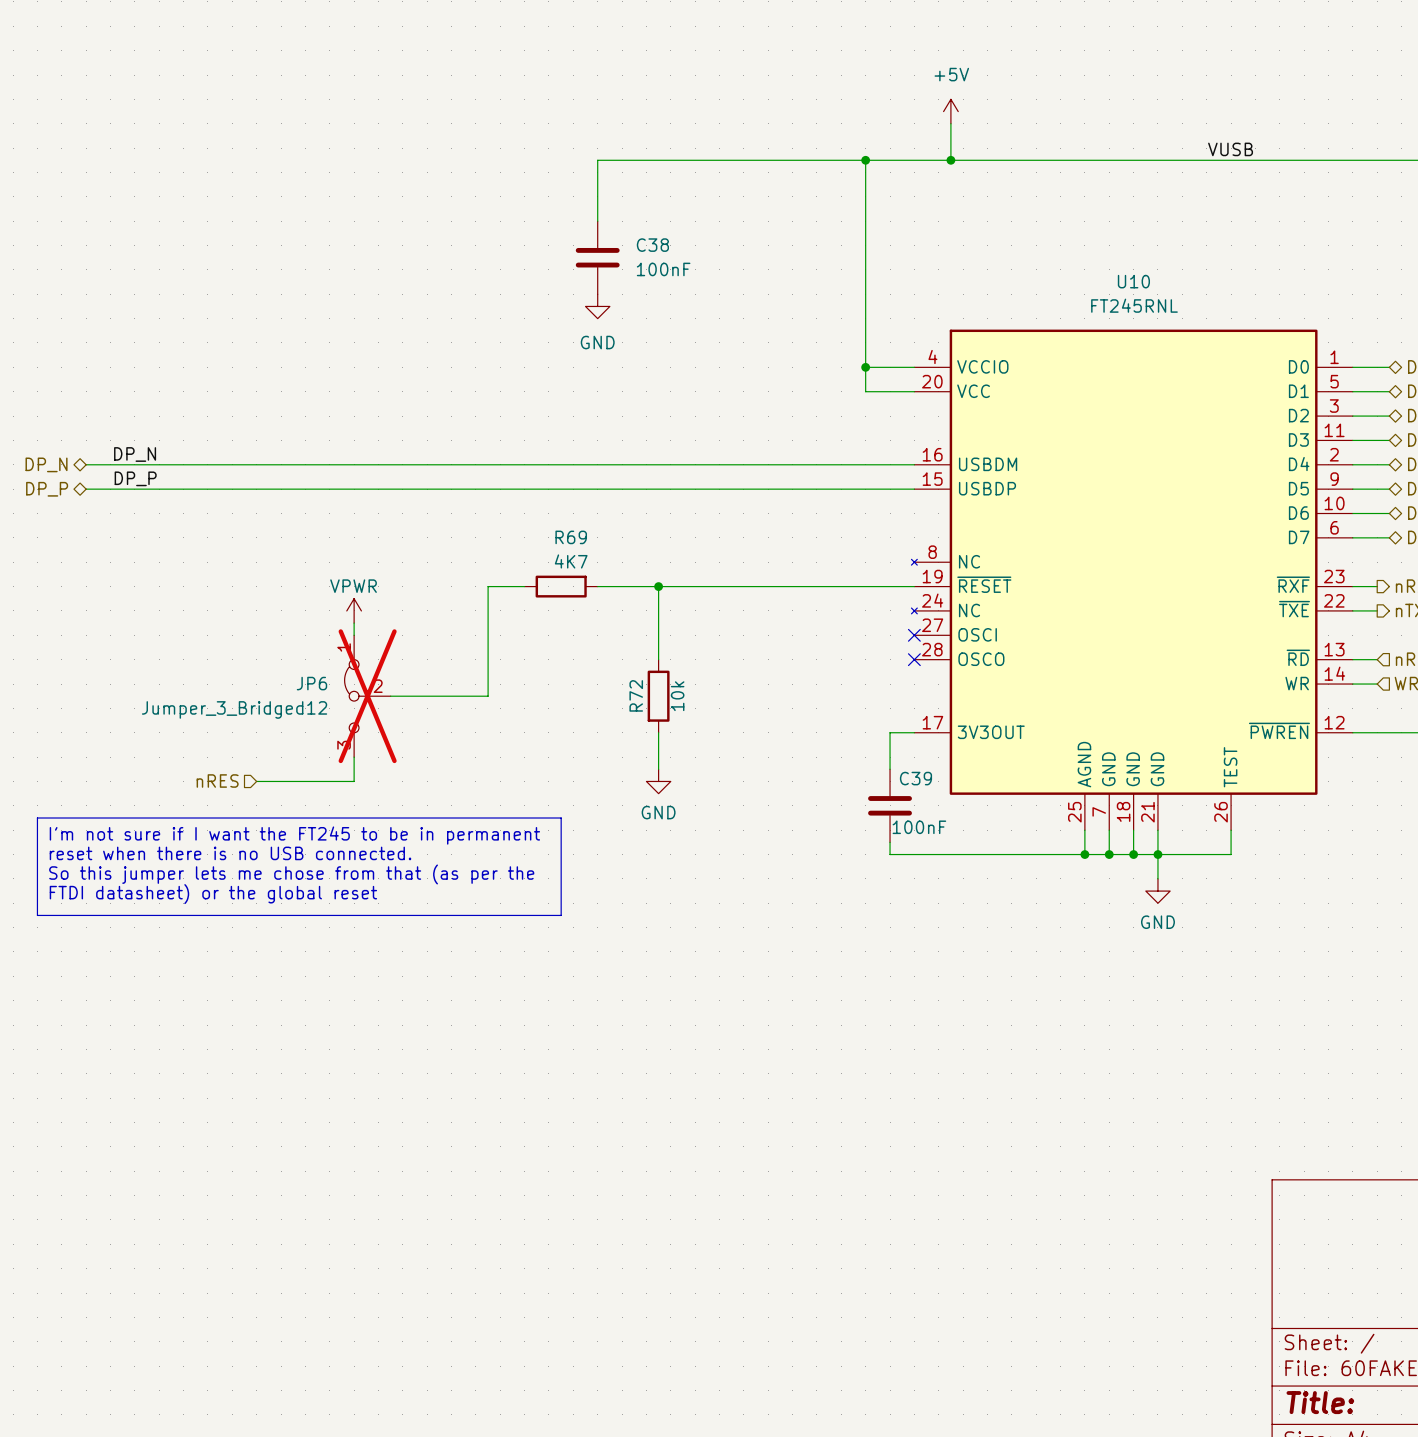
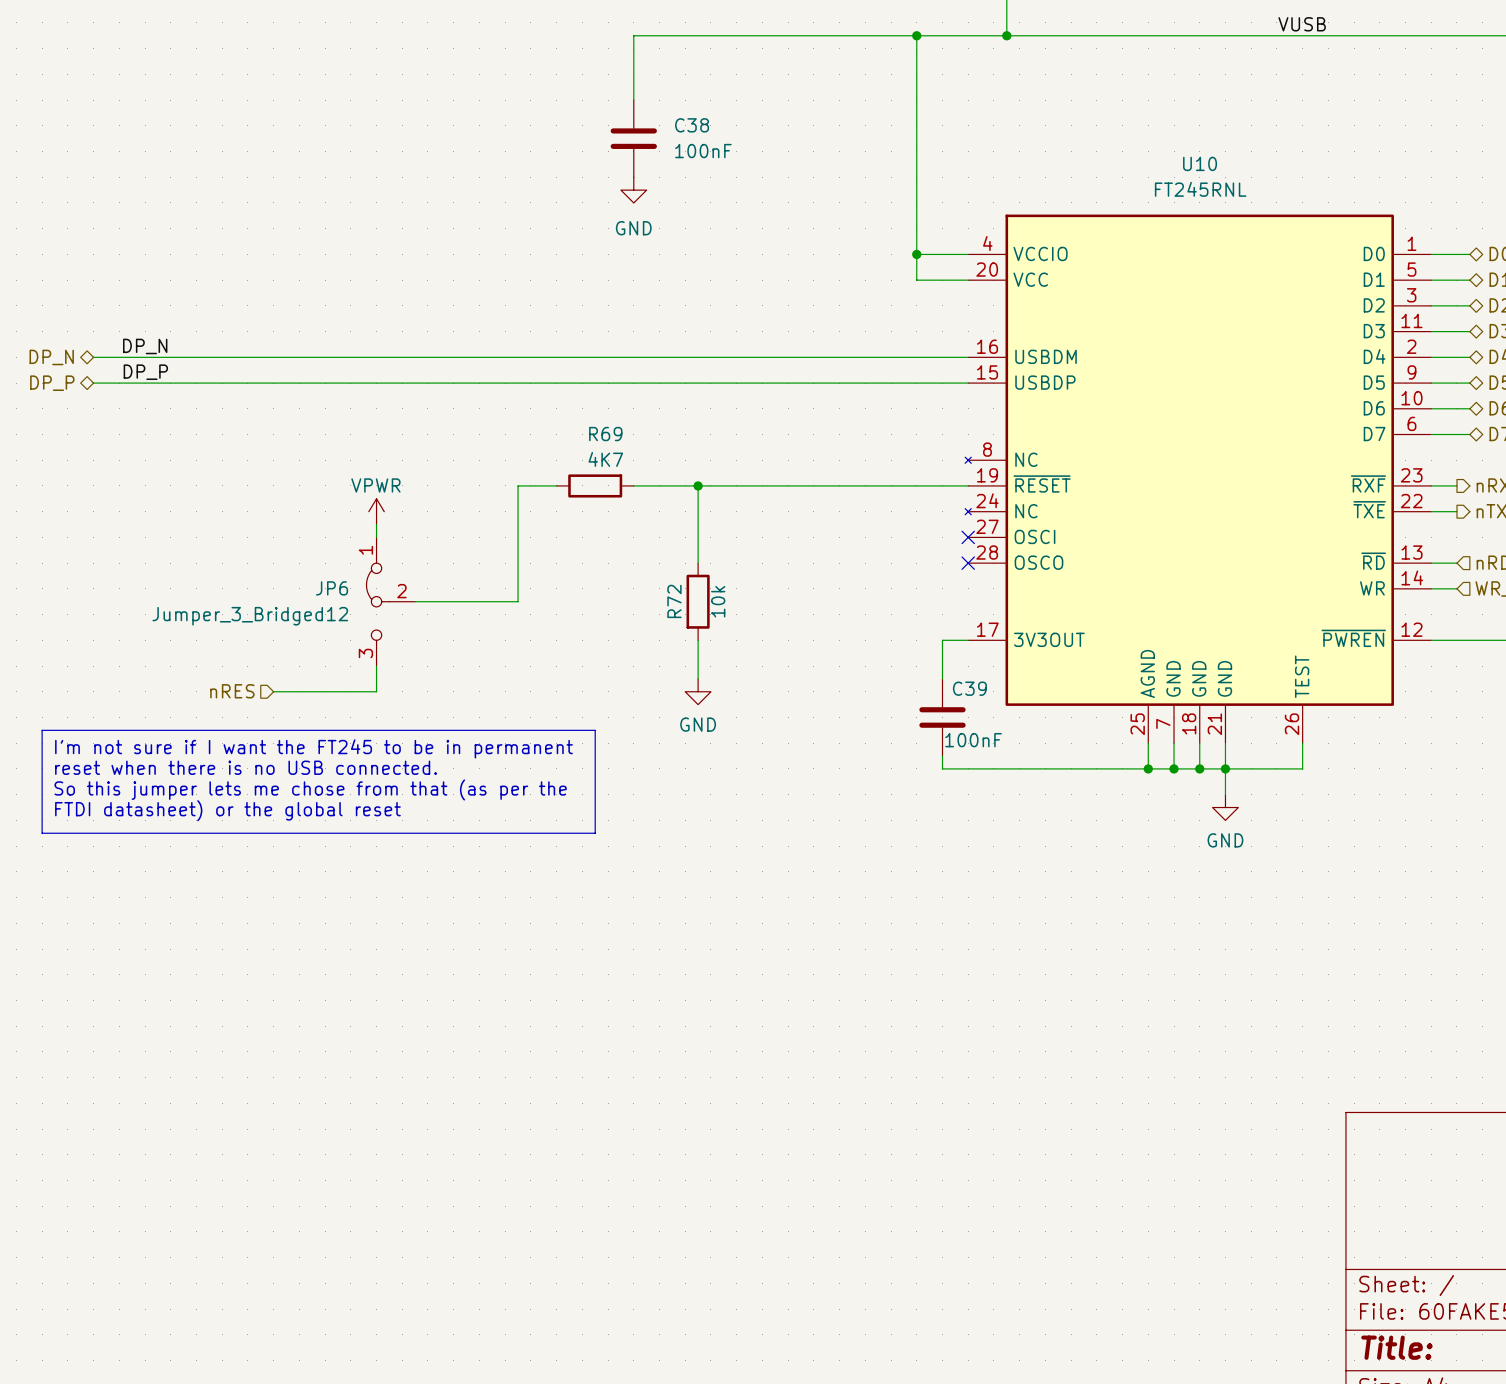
JP6 do-not-place cross: (367, 696) -> none

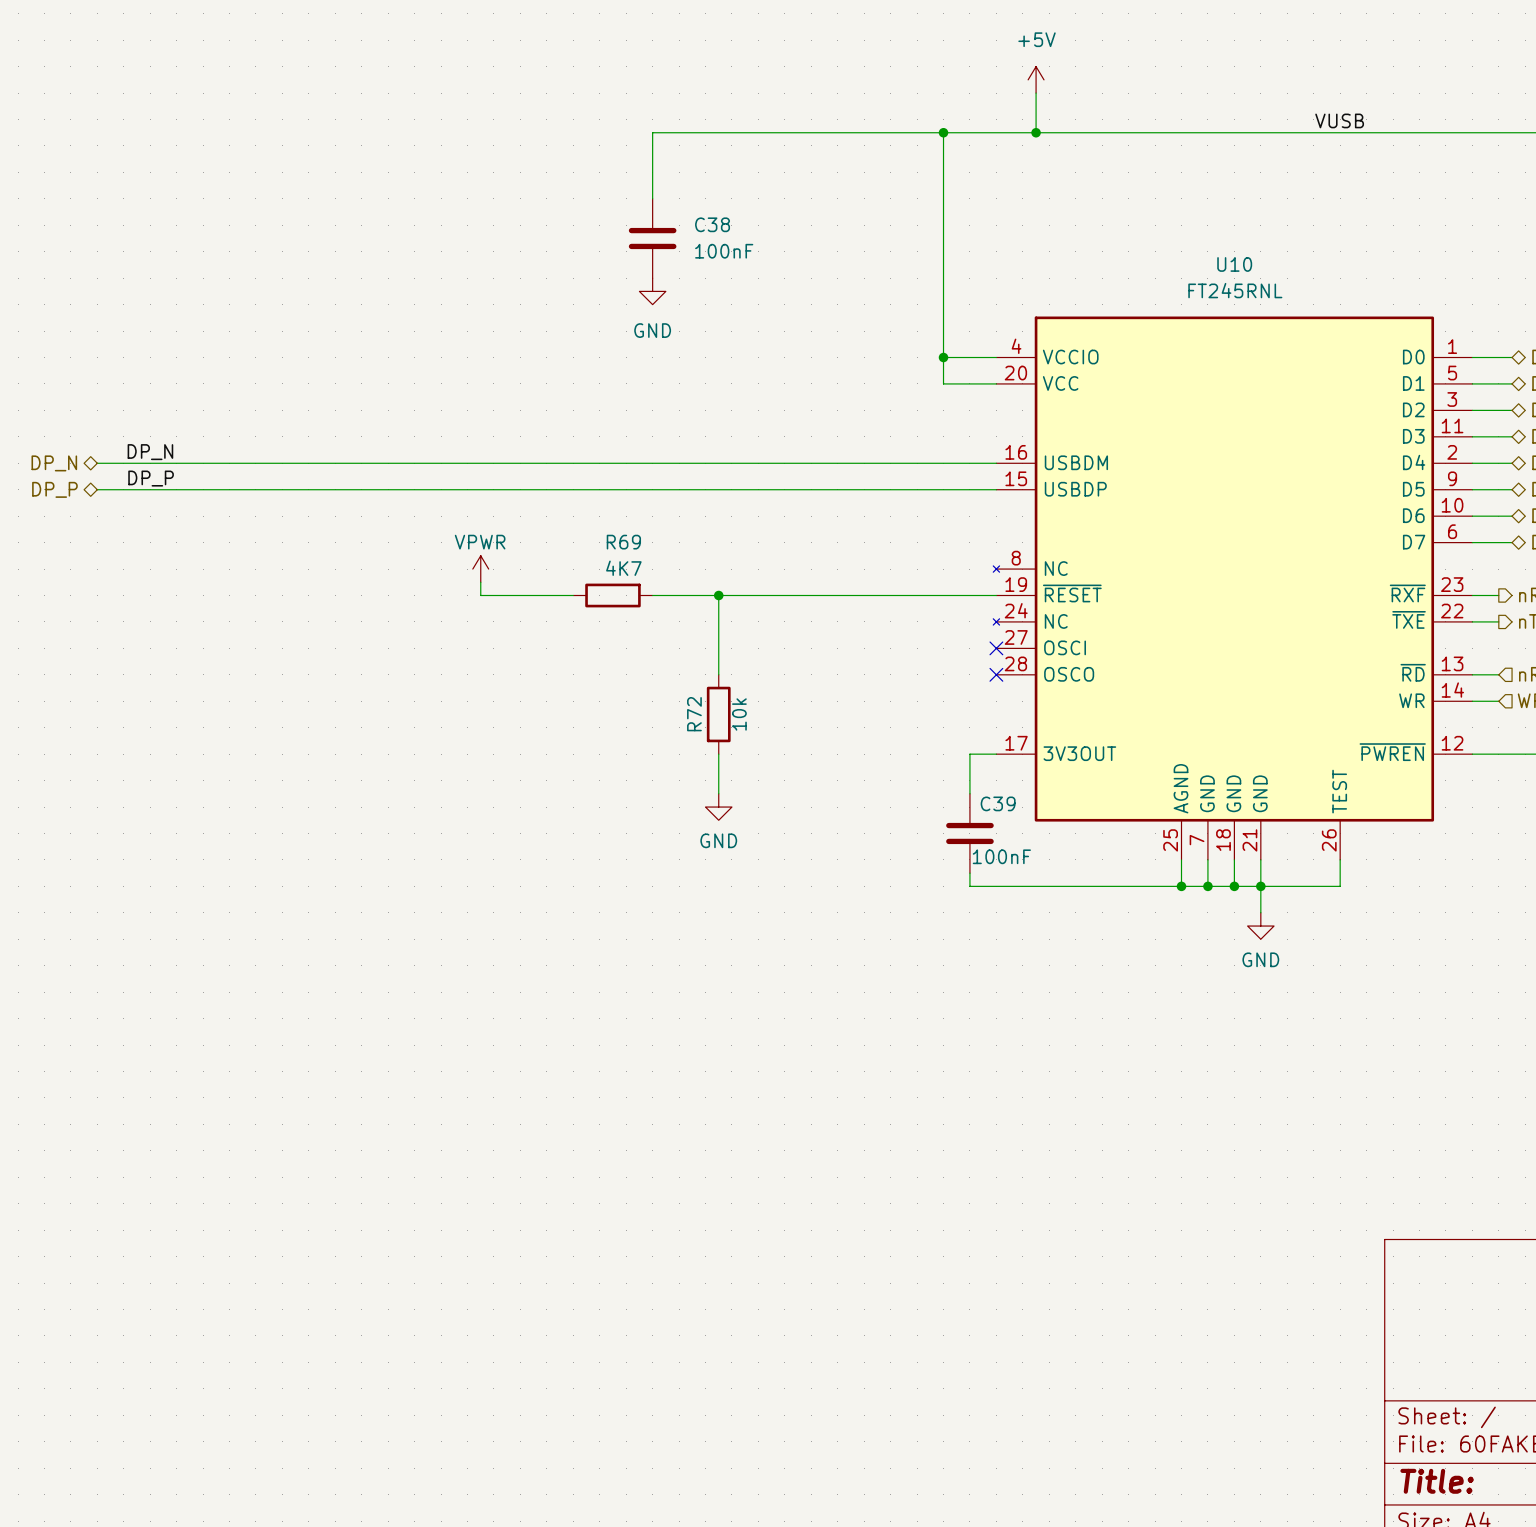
wire: (518, 485) (518, 601) (415, 601) -> (533, 595) (480, 595) (480, 582)
power symbol position: VPWR (376, 511) -> VPWR (480, 569)
wire: (376, 524) (376, 537) -> none
JP6: Jumper_3_Bridged12 (390, 601) -> none
wire: (376, 666) (376, 691) (273, 691) -> none
hierarchical label: nRES (232, 691) -> none
line: (42, 730) (595, 730) (595, 833) (42, 833) (42, 730) -> none
text: I'm not sure if I want the FT245 to be in permanent (314, 748) -> none
text: reset when there is no USB connected. (246, 767) -> none
text: So this jumper lets me chose from that (as per the (310, 789) -> none
text: FTDI datasheet) or the global reset (227, 810) -> none

